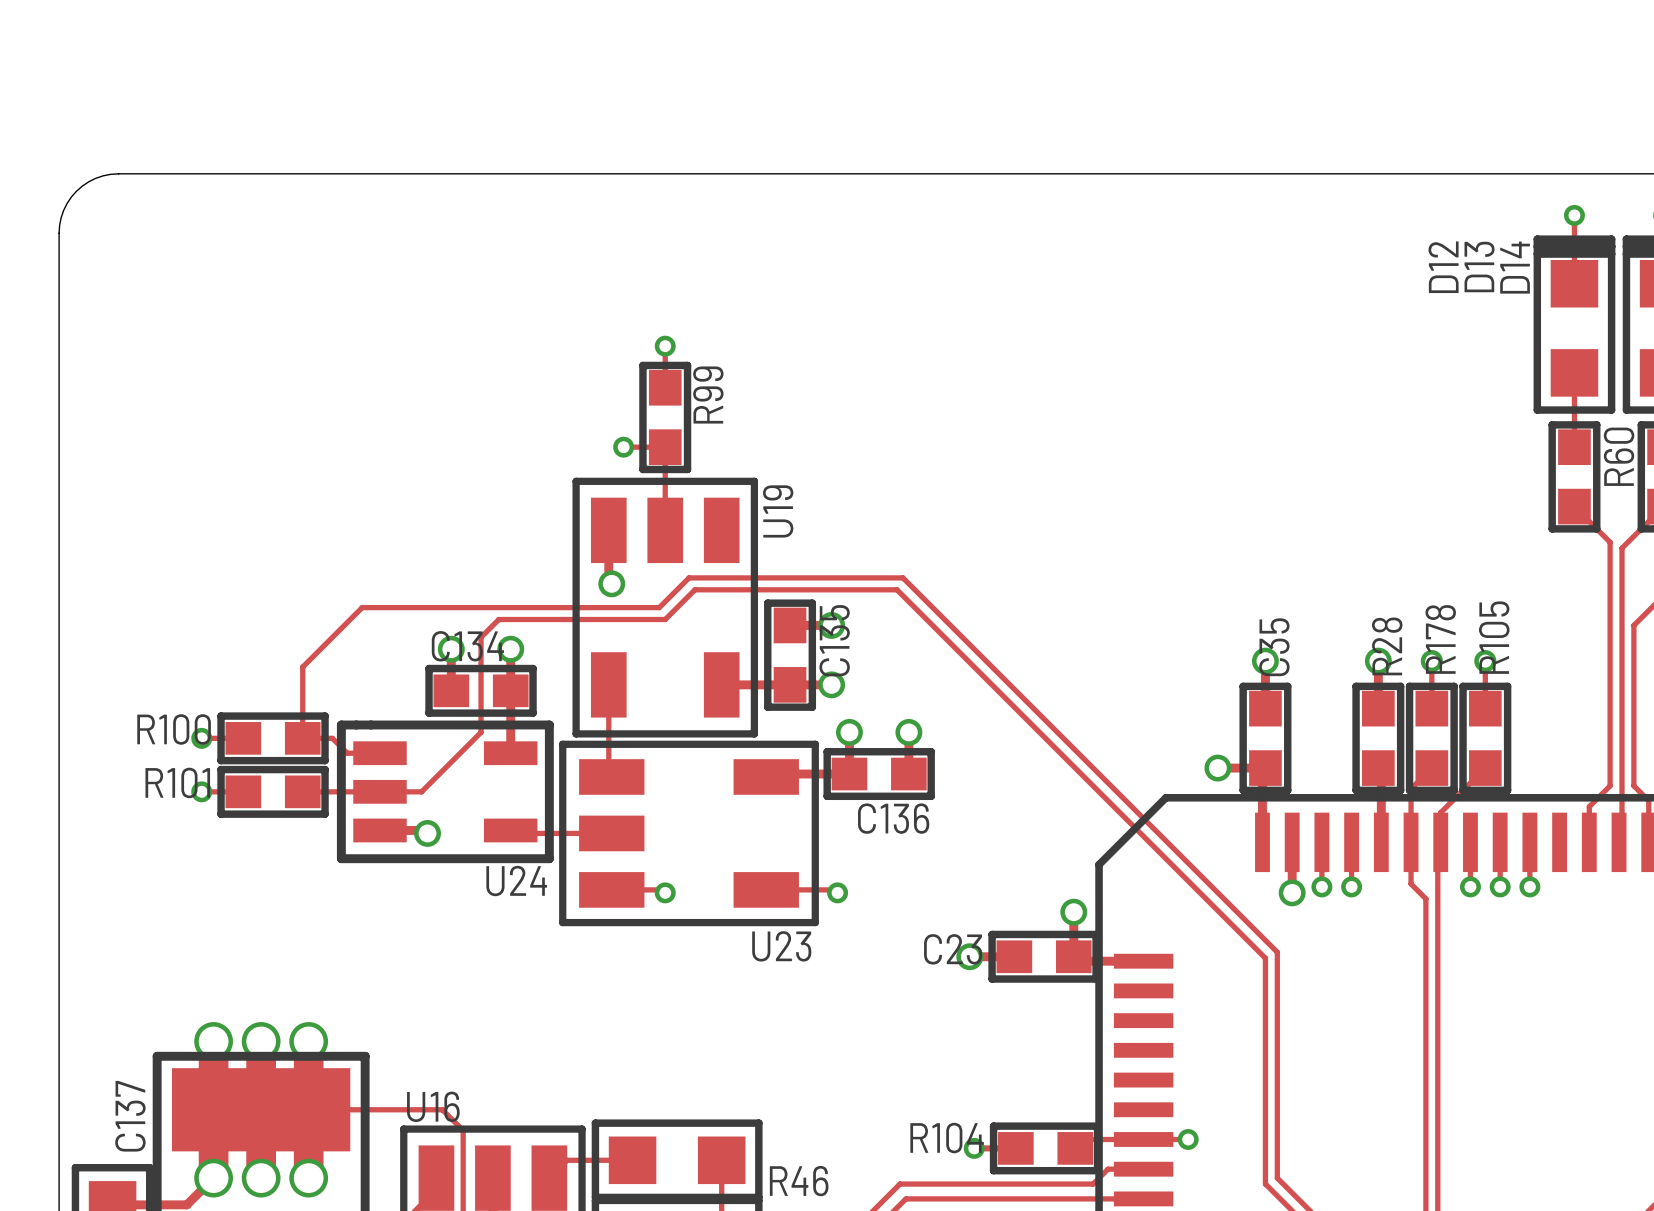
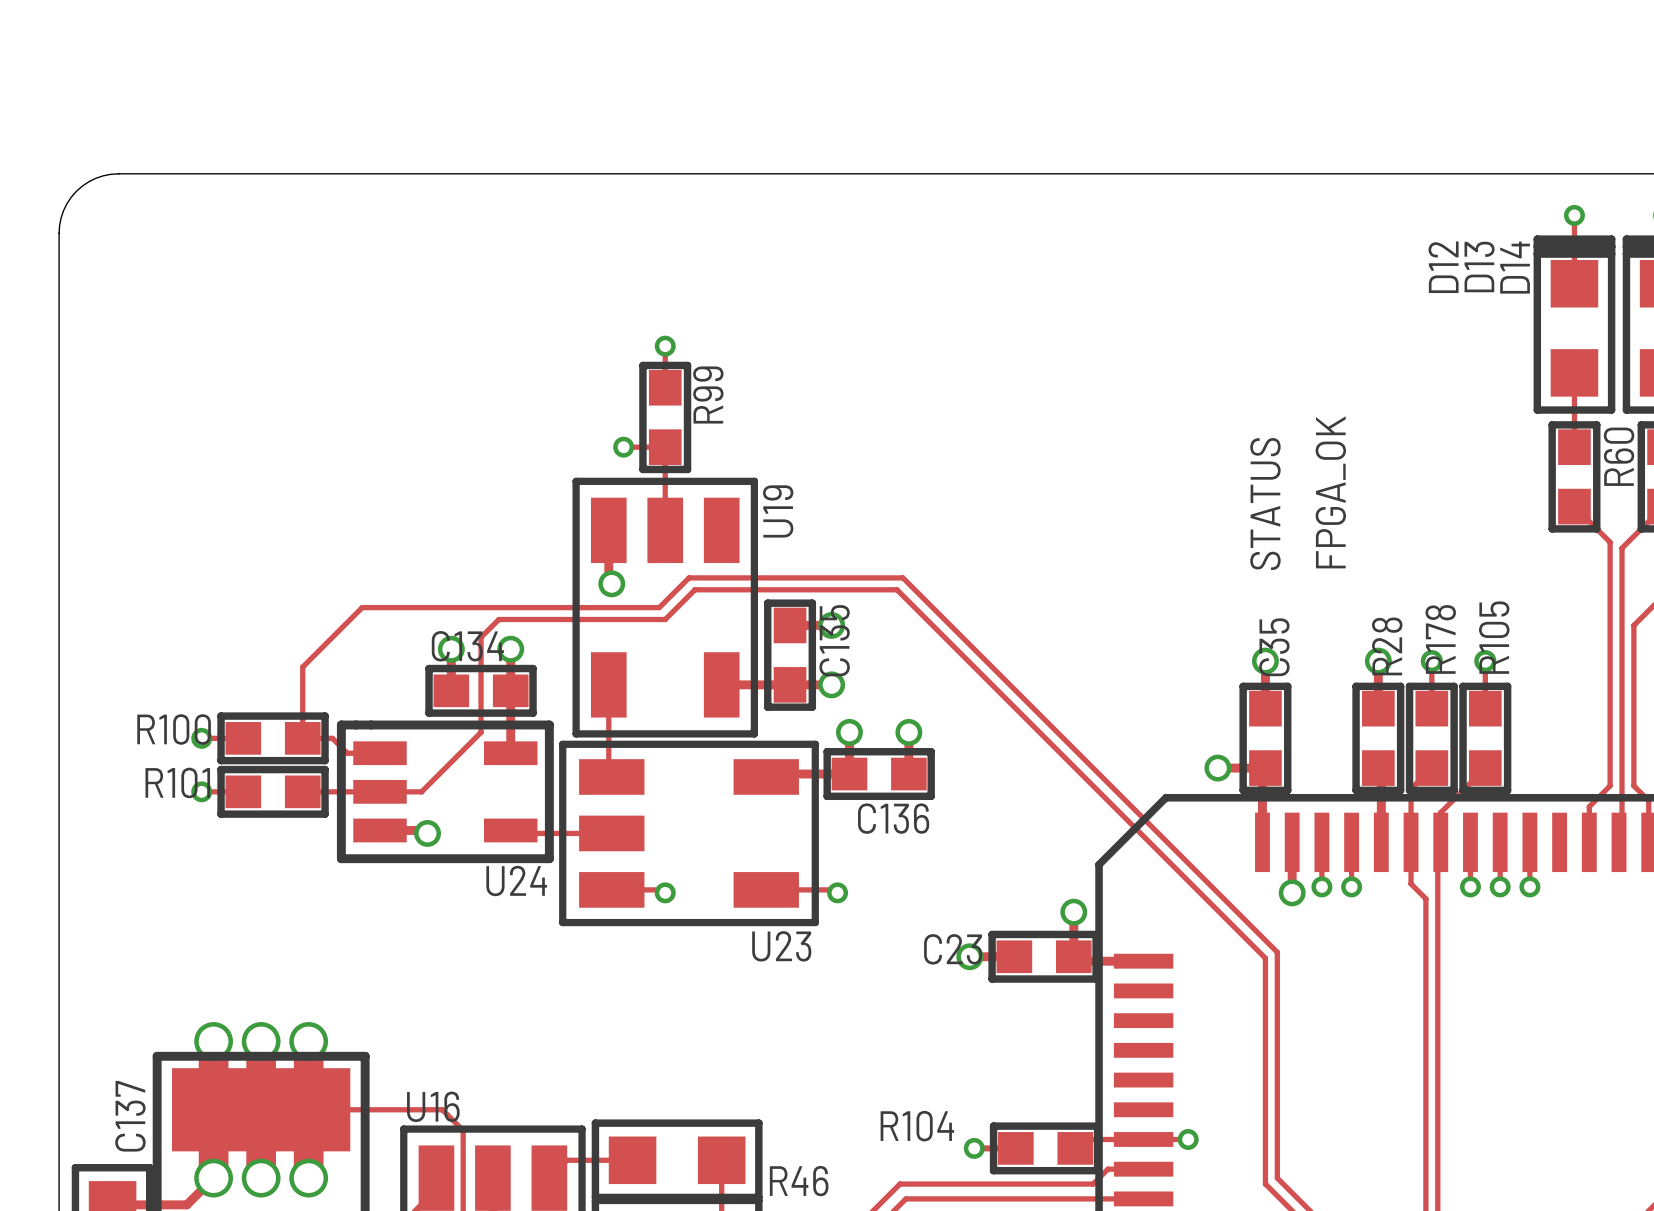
text: none -> FPGA_OK (1330, 492)
text: none -> STATUS (1265, 503)
R104 name position: R104 (947, 1138) -> R104 (917, 1126)

